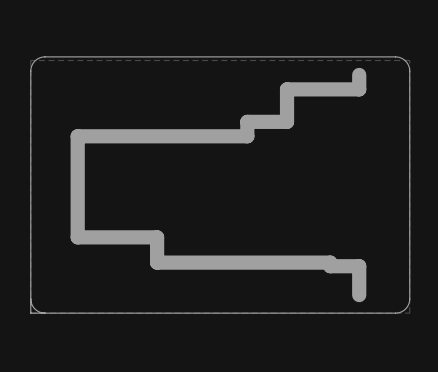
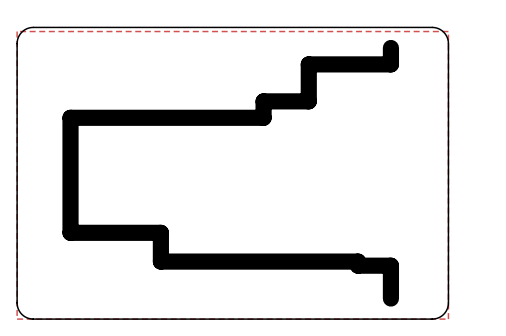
board edge: (30, 298) (30, 313) (44, 313) -> none

